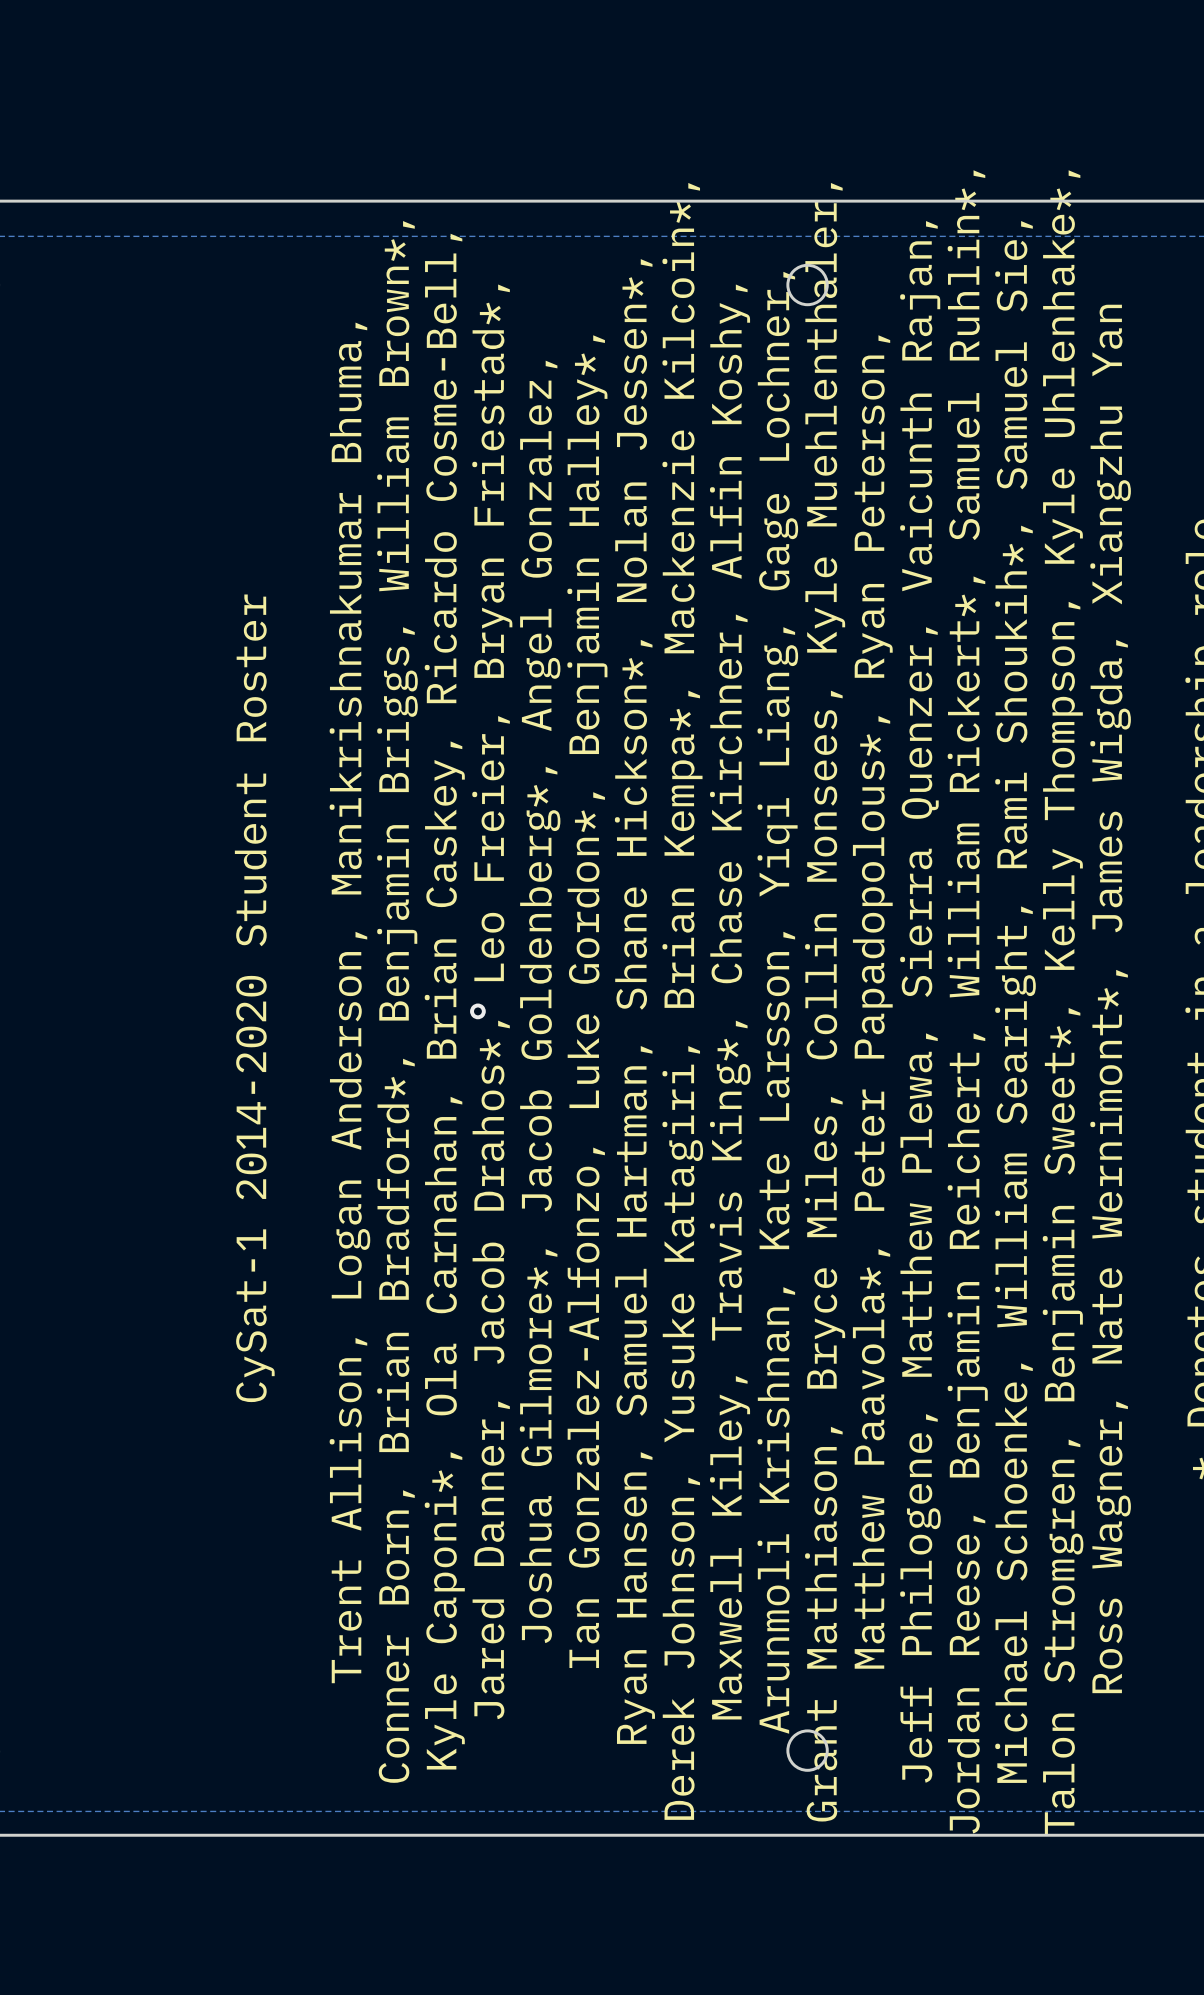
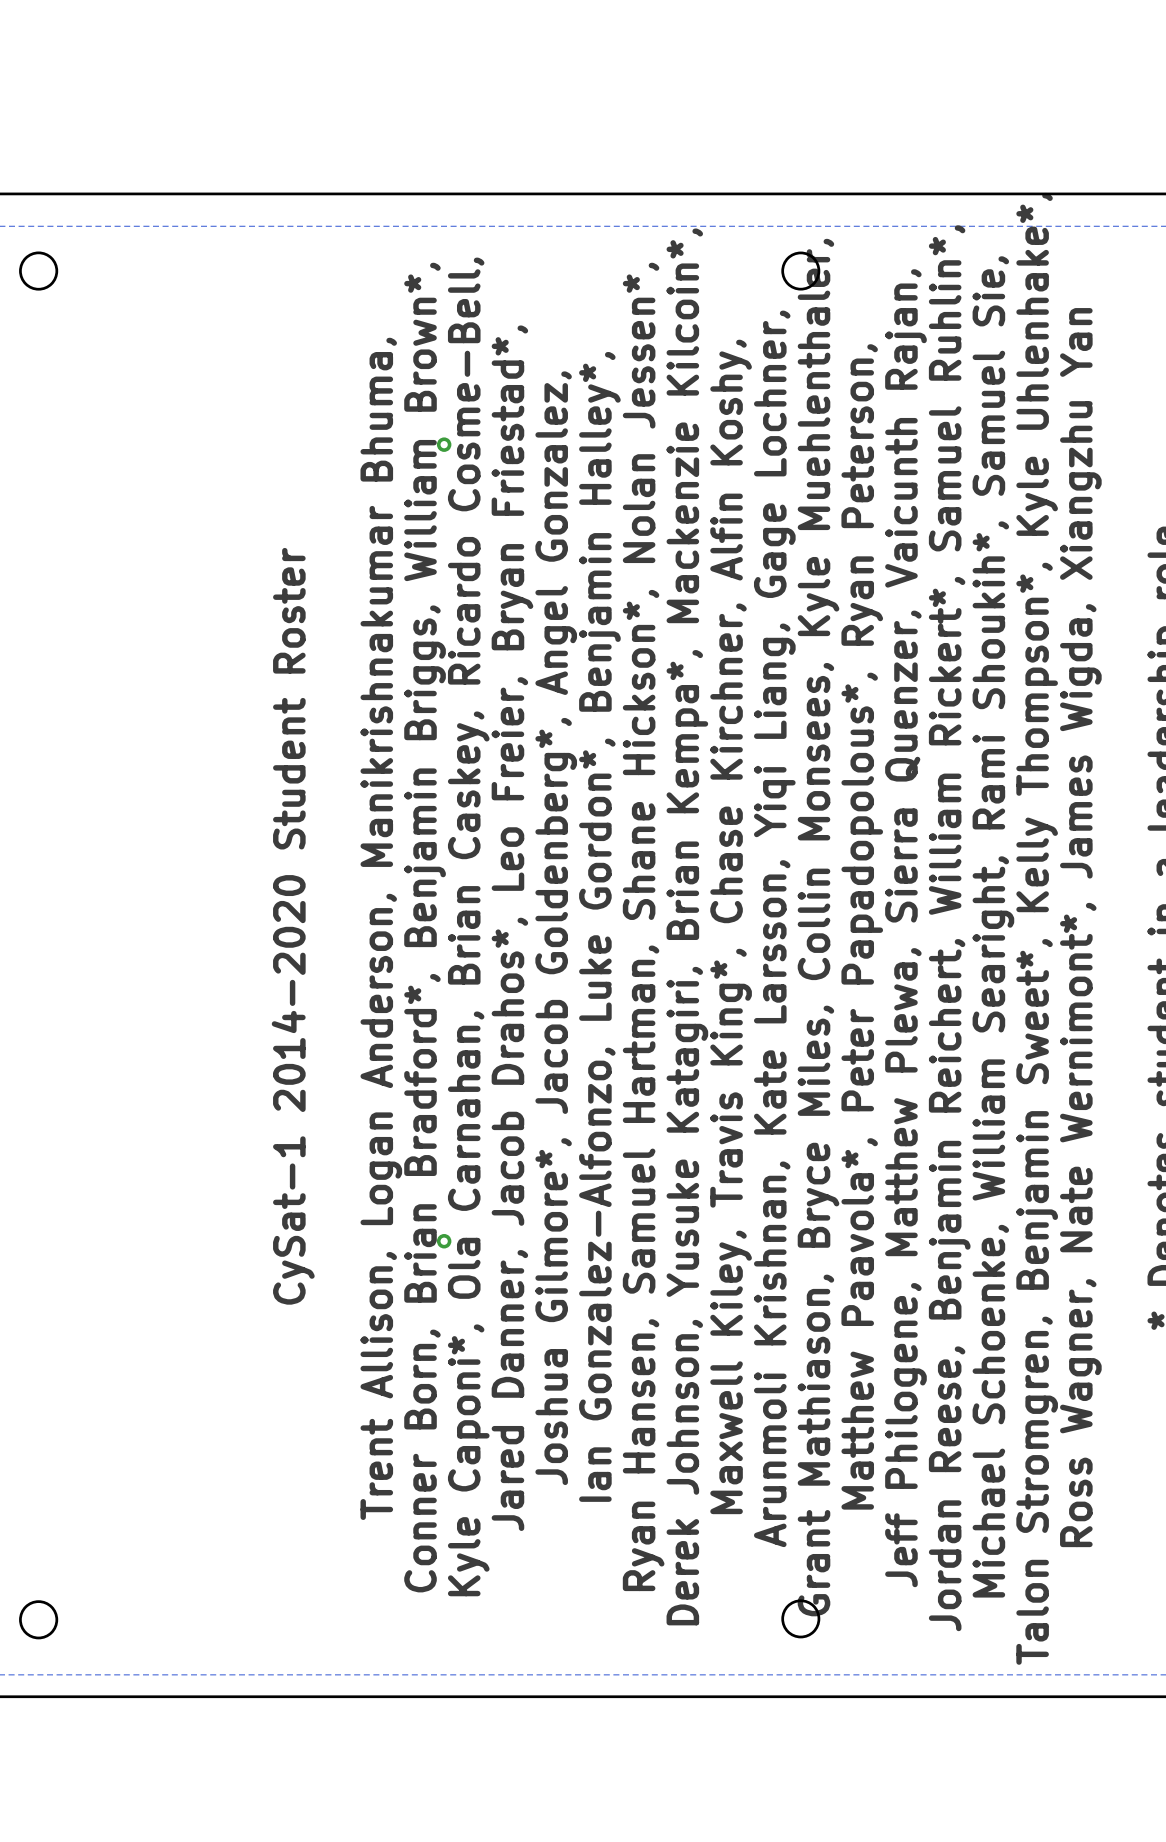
via: none -> (444, 444)
text: Talon Stromgren, Benjamin Sweet*, Kelly Thompson, Kyle Uhlenhake*, (1063, 1002) -> Talon Stromgren, Benjamin Sweet*, Kelly Thompson*, Kyle Uhlenhake*, (1037, 928)
via: (477, 1011) -> none
via: none -> (444, 1241)

